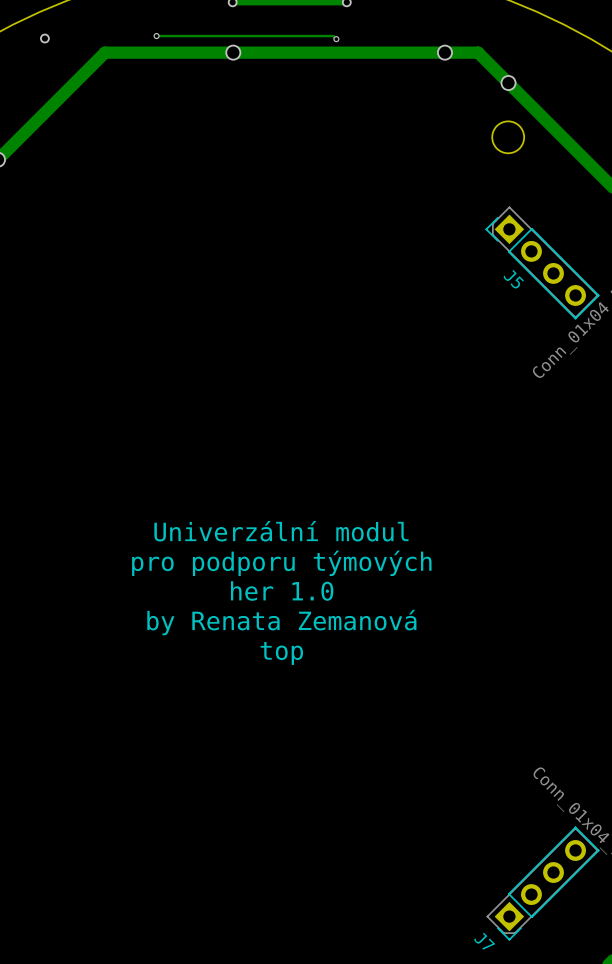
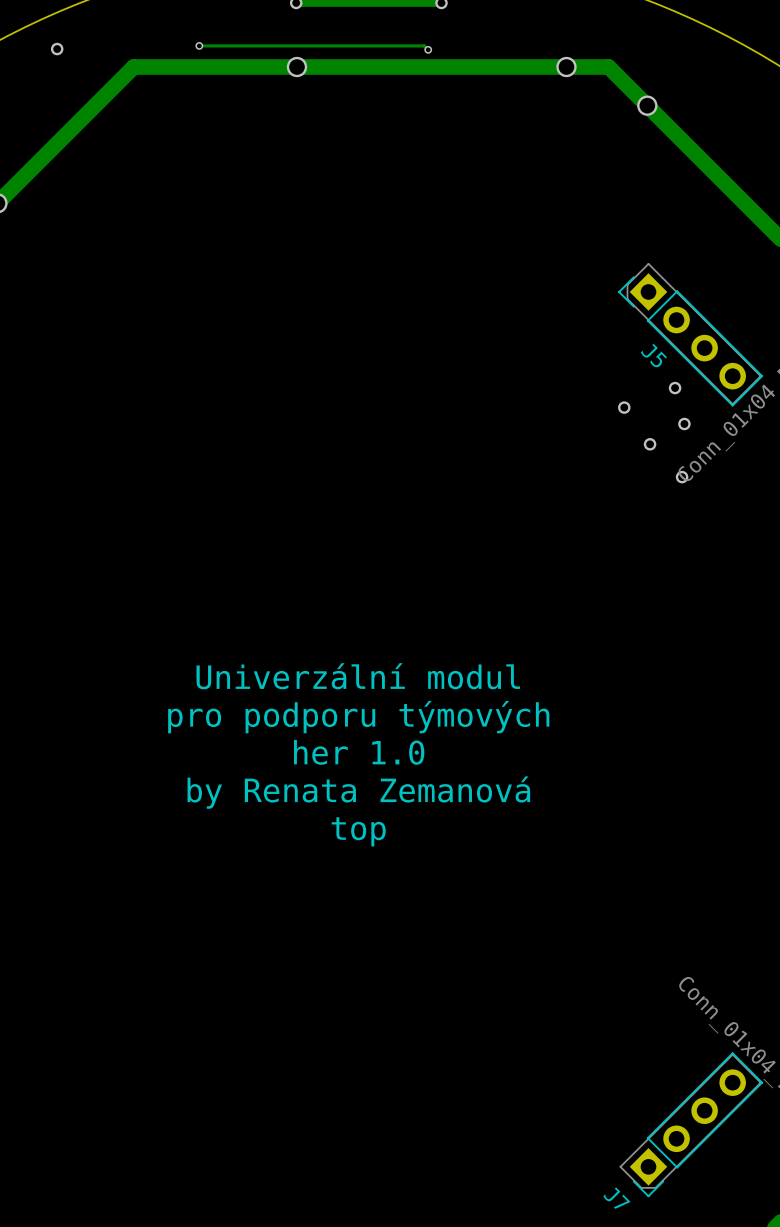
round board edge: [491, 120, 525, 154] -> none
via: none -> (675, 388)
via: none -> (624, 407)
via: none -> (684, 423)
via: none -> (650, 444)
via: none -> (682, 477)

